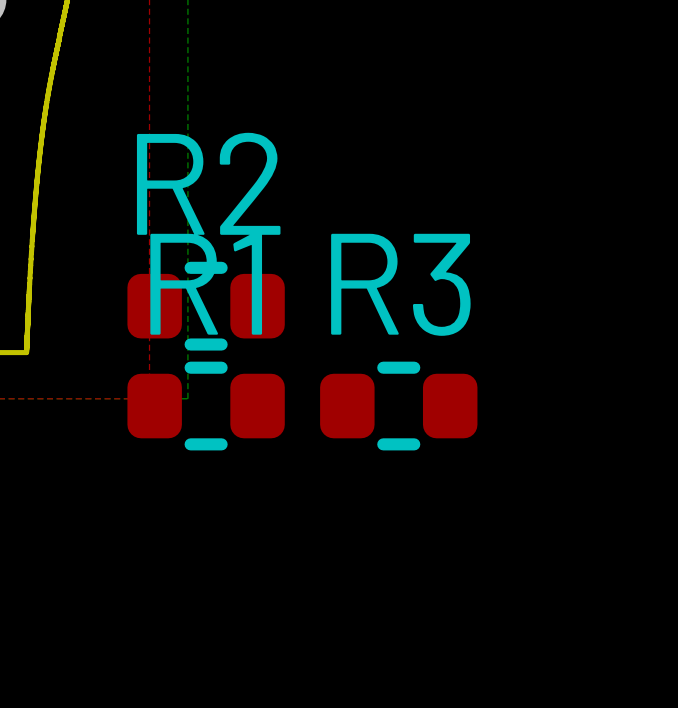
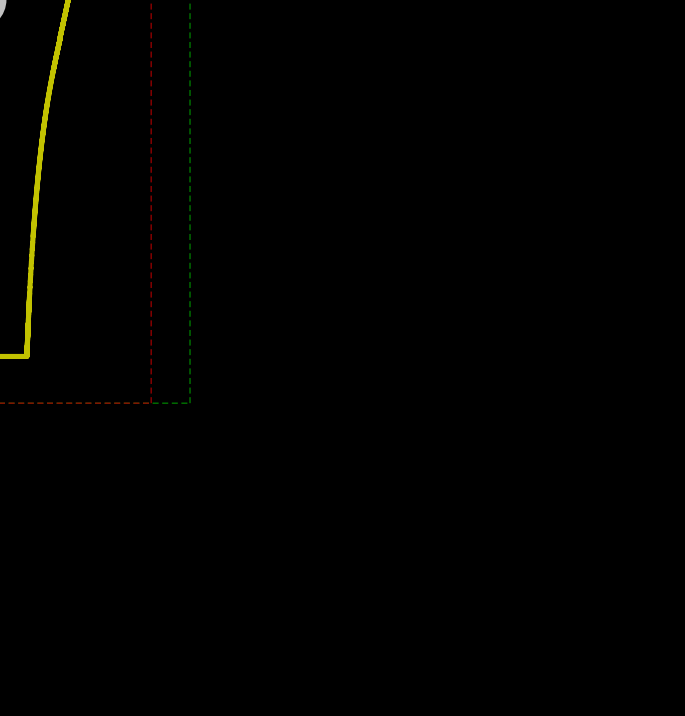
R2: (206, 306) -> none
R1: (206, 406) -> none
R3: (398, 406) -> none

